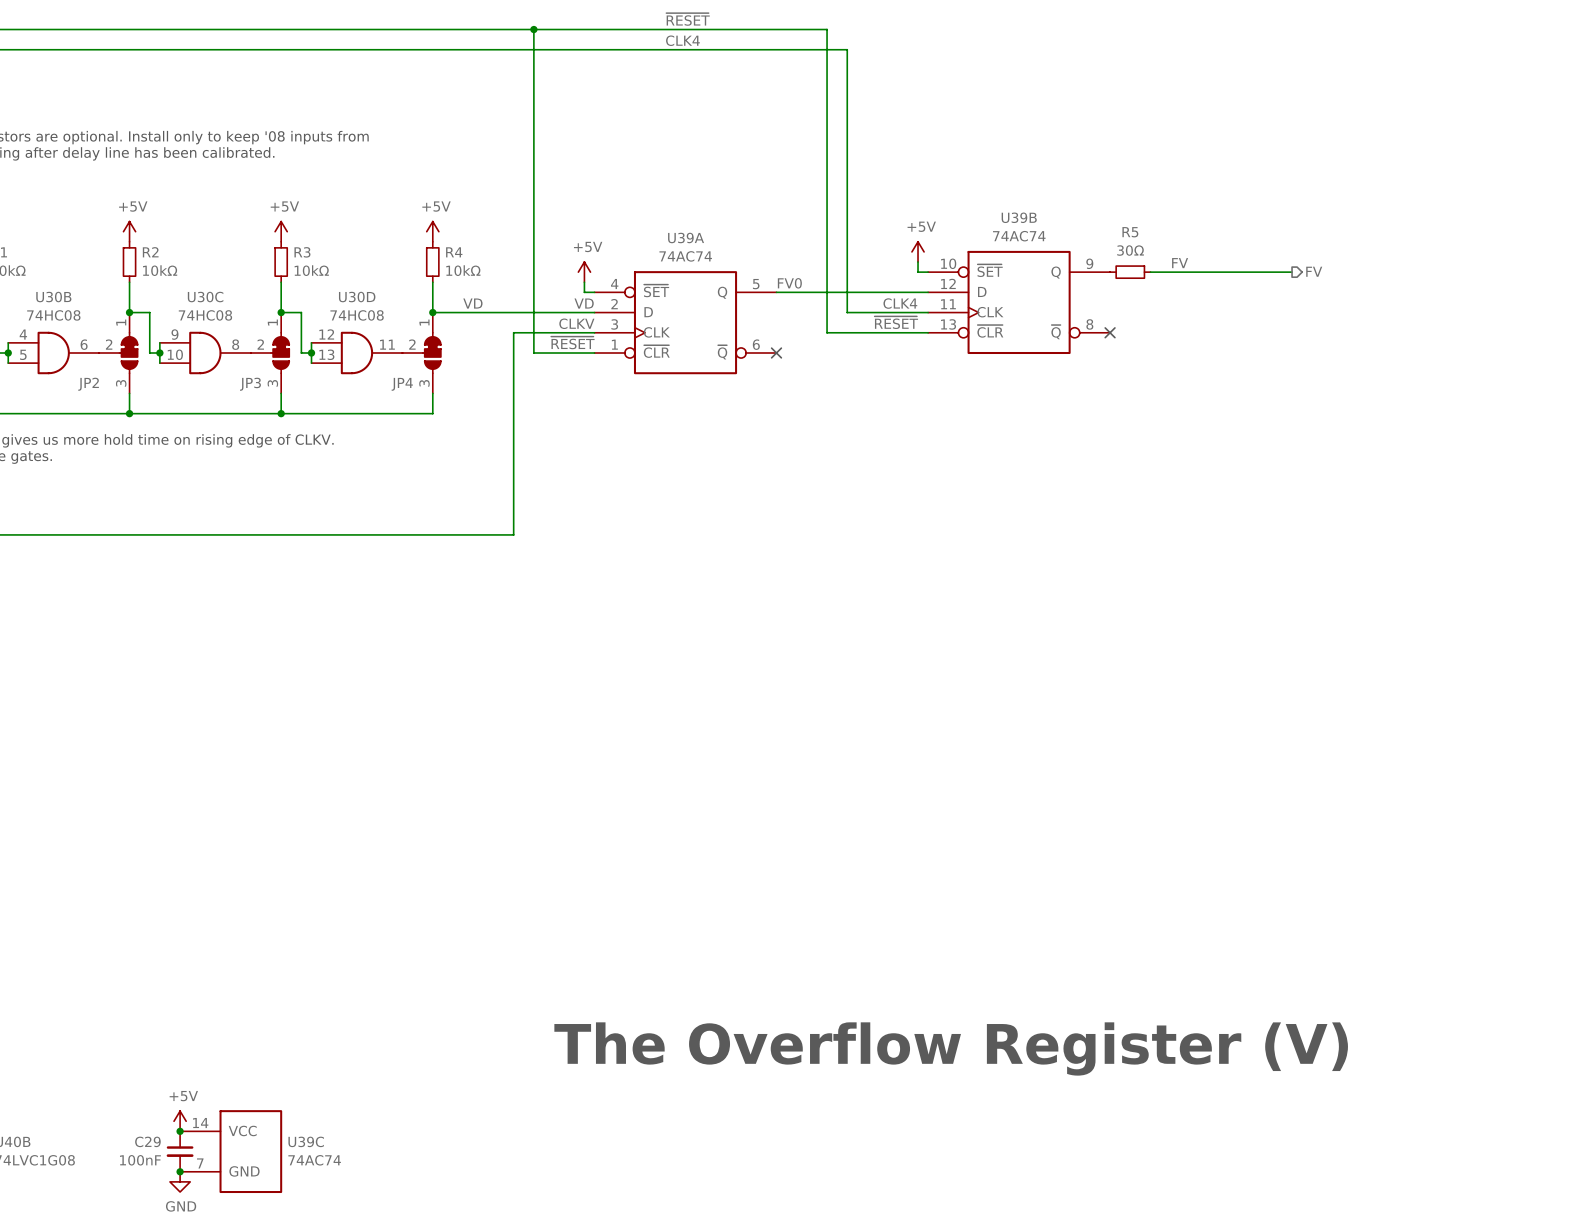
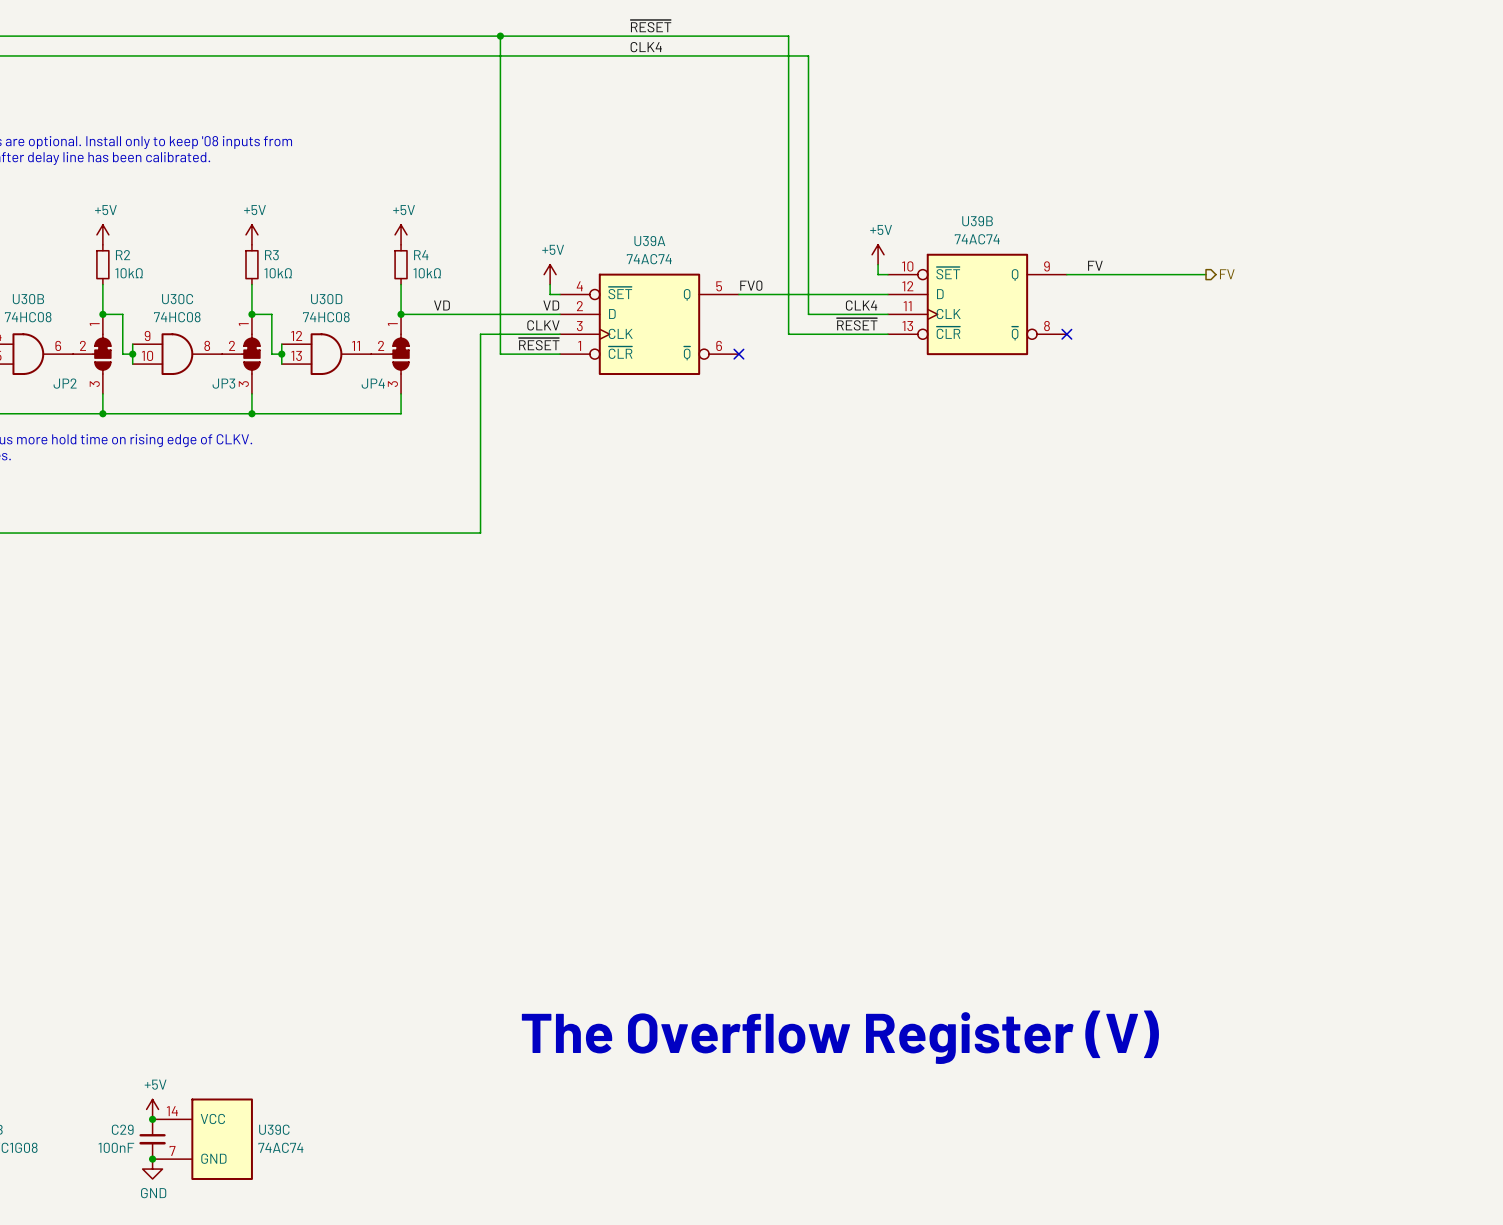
label position: FV (1180, 263) -> FV (1095, 265)
hierarchical label position: FV (1314, 271) -> FV (1227, 274)
R5: 30Ω (1130, 272) -> none
wire: (1251, 272) (1292, 272) -> (1066, 274) (1106, 274)

